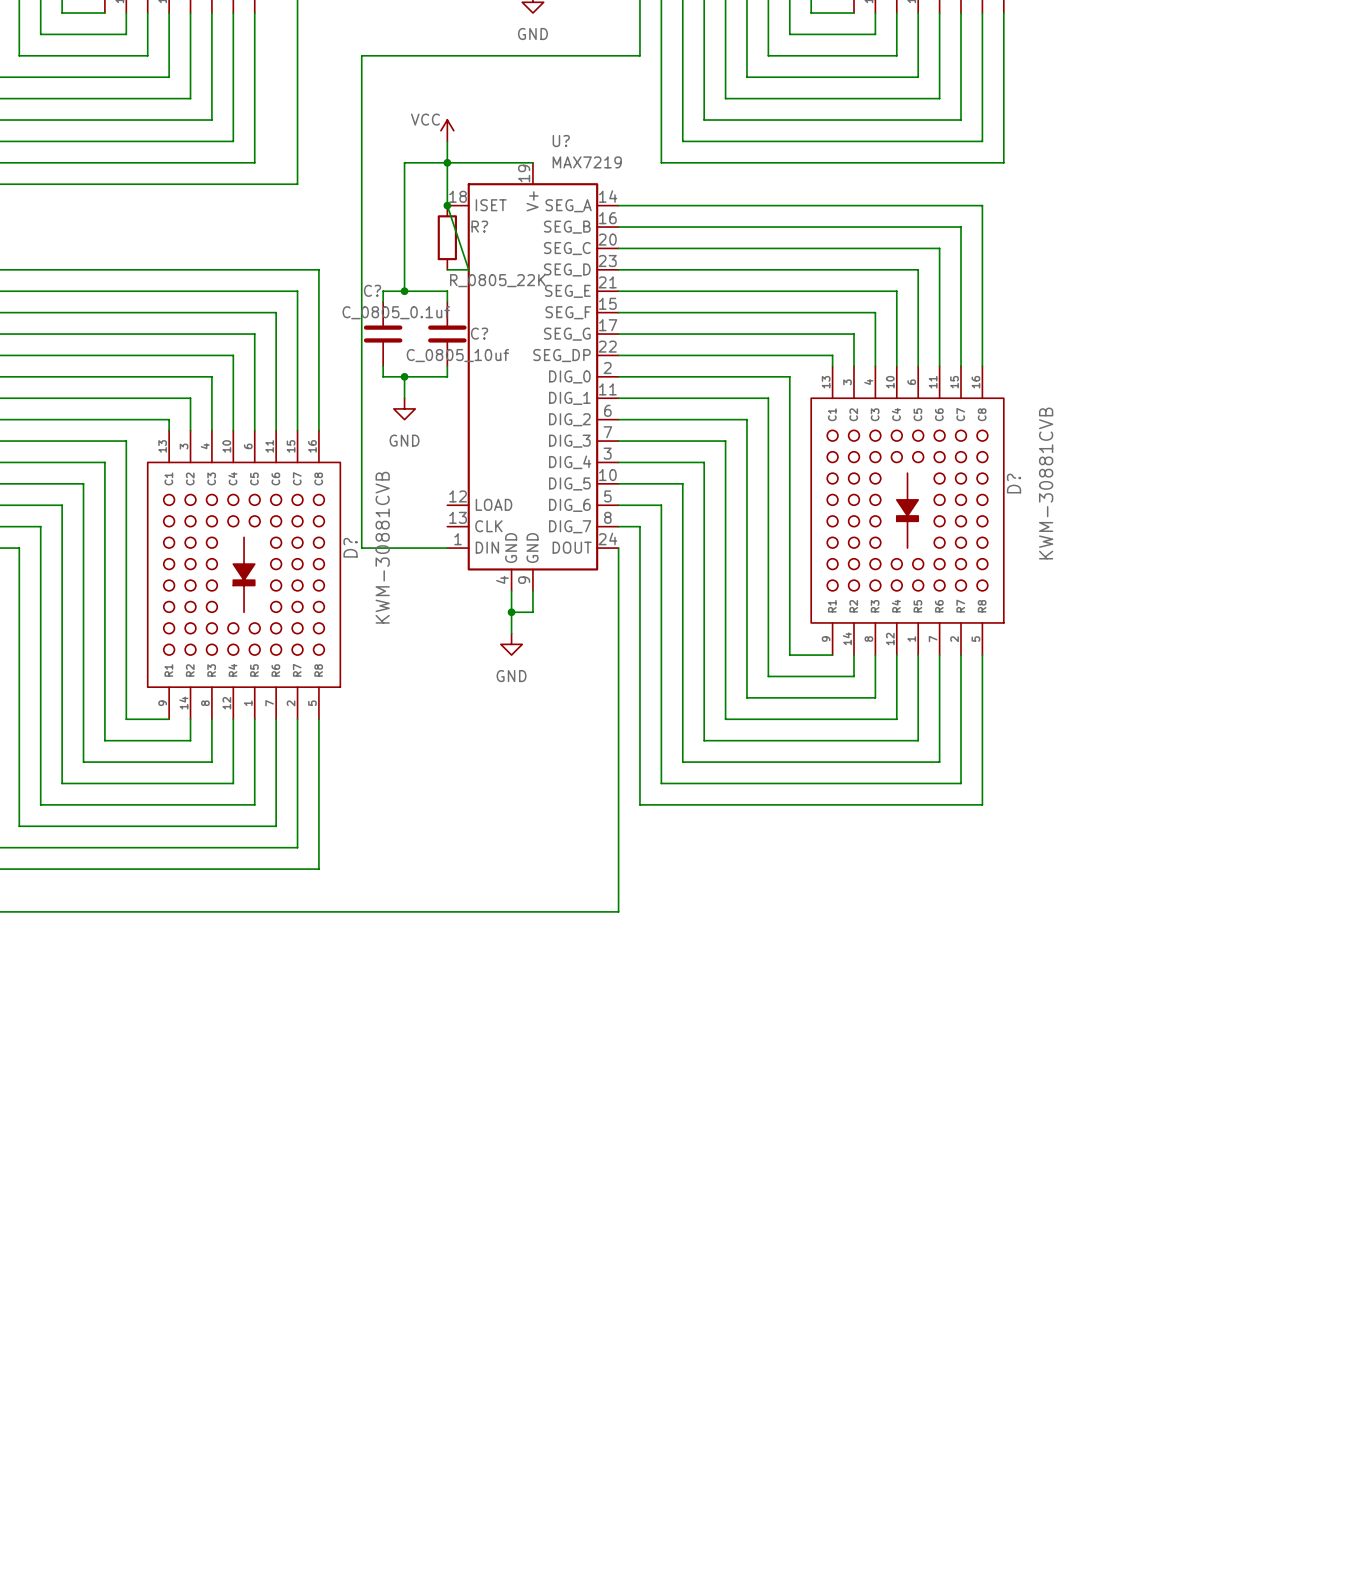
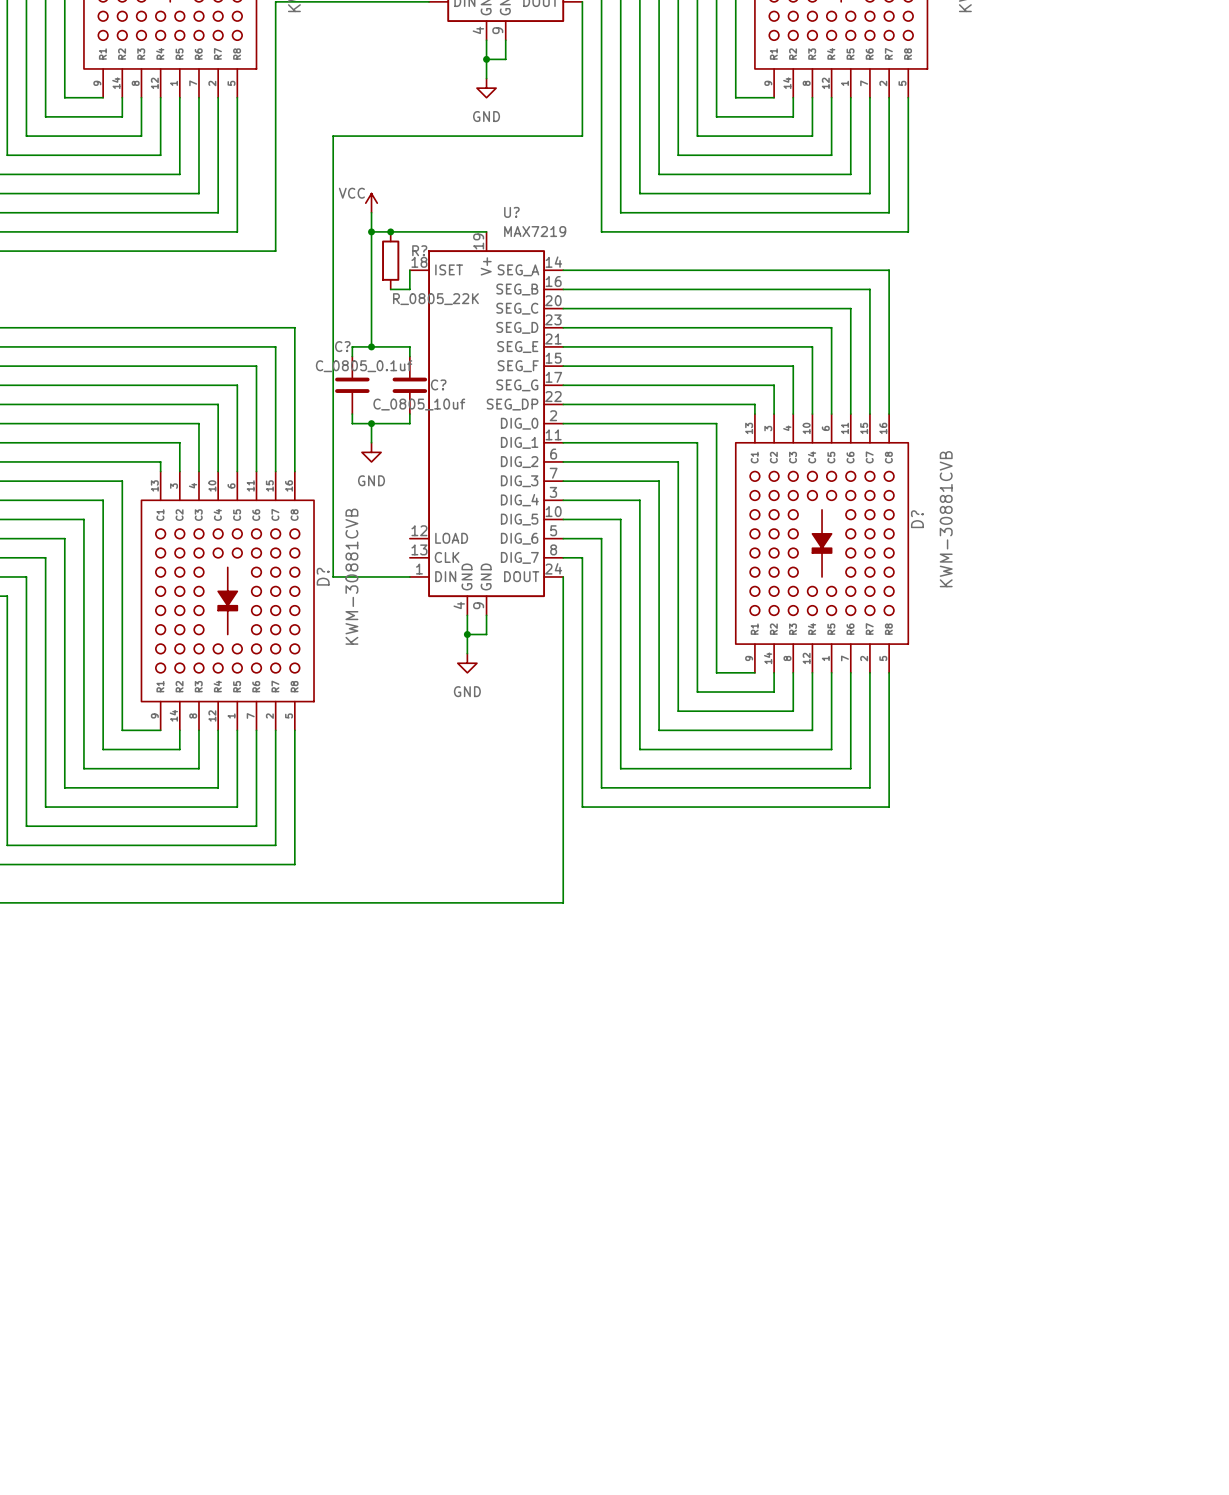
power symbol position: VCC (447, 130) -> VCC (371, 203)
wire: none -> (371, 212) (371, 231)
wire: (447, 141) (447, 205) (468, 269) (447, 269) -> none
junction: none -> (371, 231)
junction: none -> (390, 231)
junction: (447, 162) -> none
wire: none -> (409, 270) (409, 289) (390, 289)
junction: (447, 205) -> none
R? position: (447, 237) -> (390, 260)

